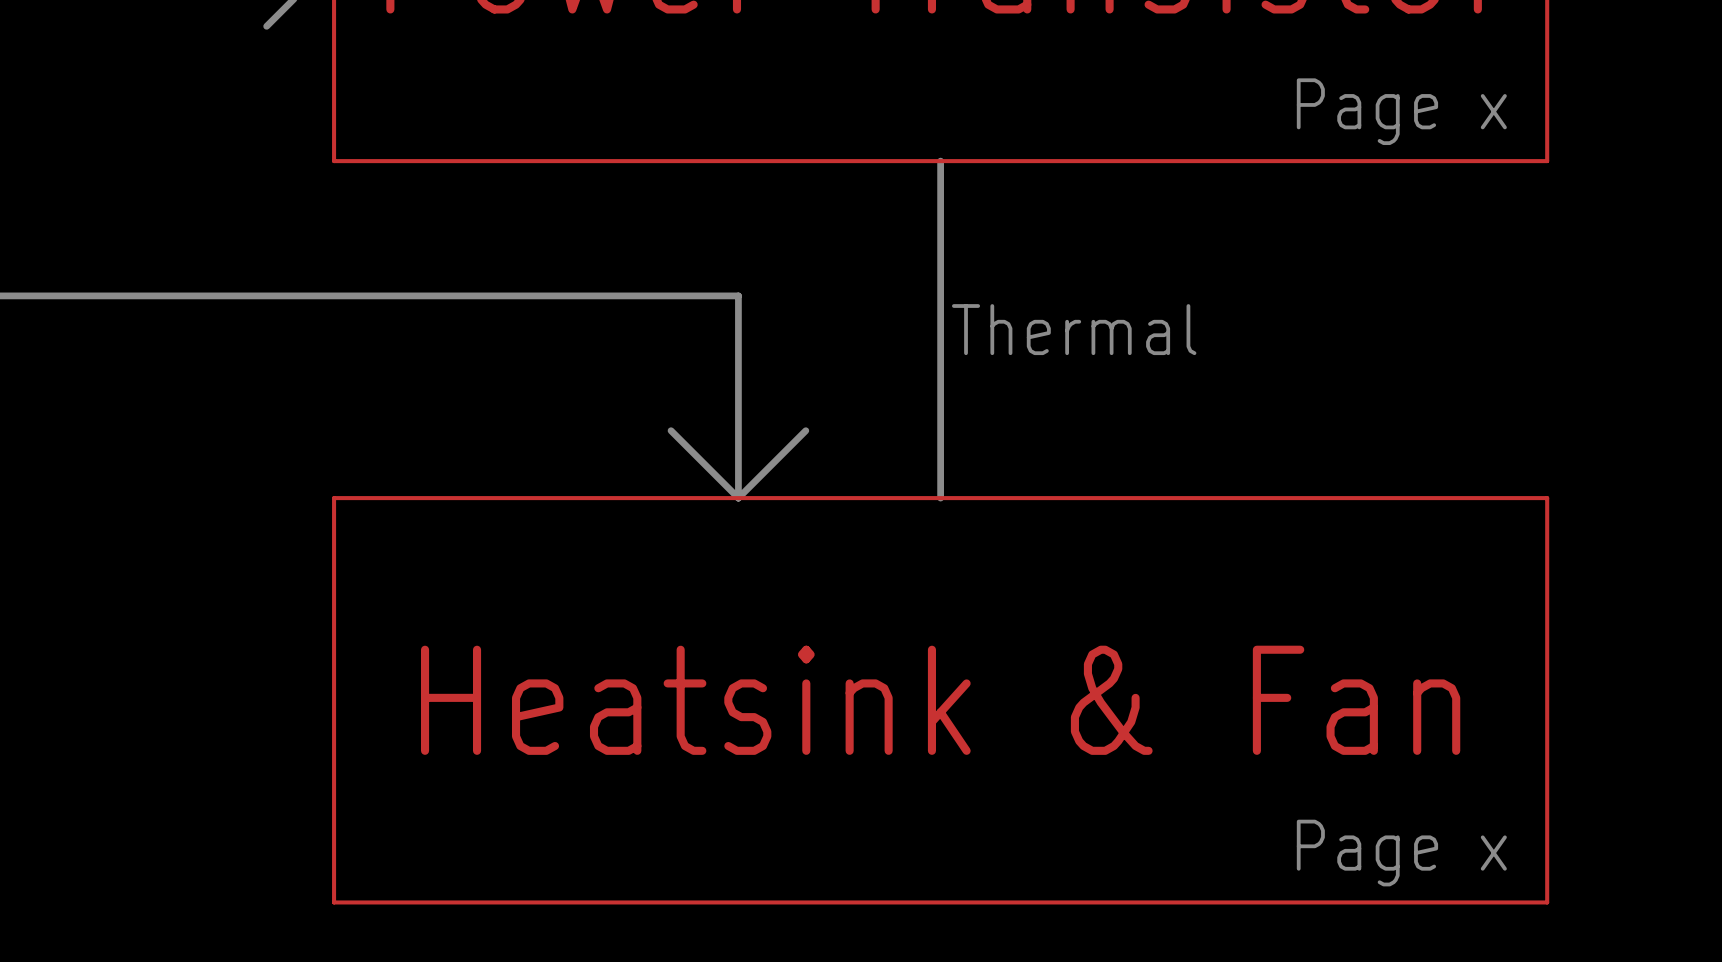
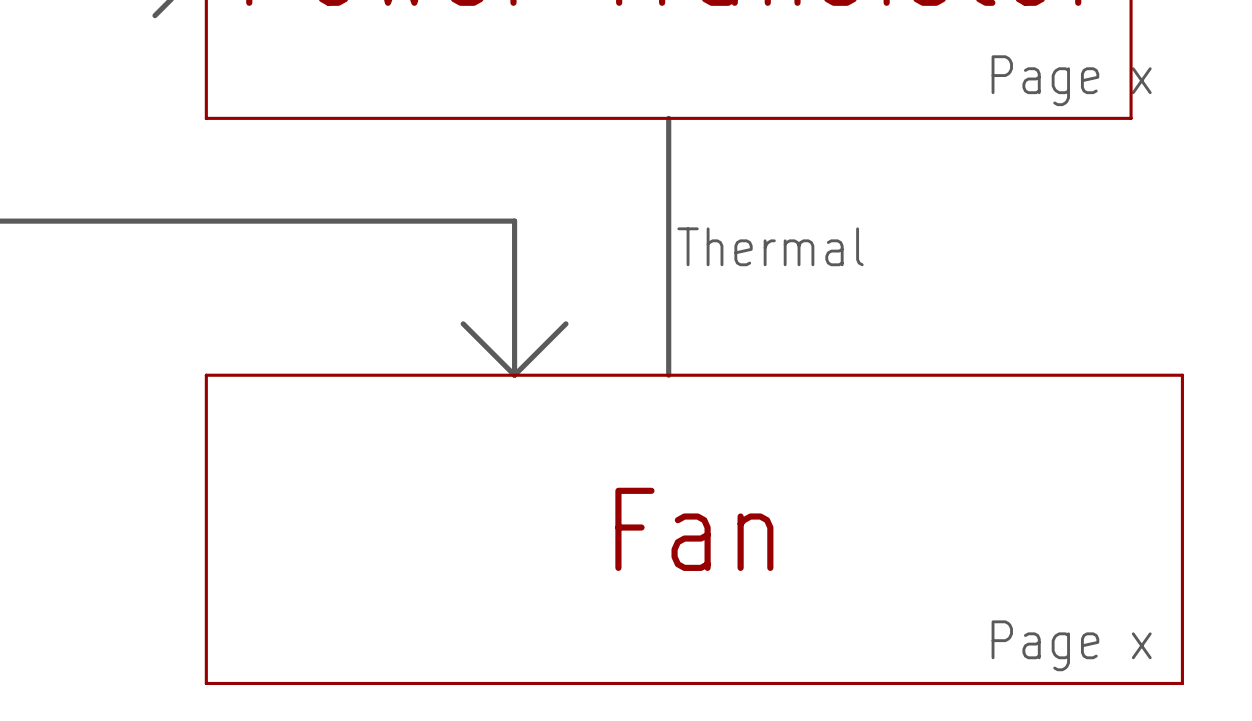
text position: Page x (1401, 111) -> Page x (1071, 80)
line: (1547, 498) (1547, 902) -> (1131, 375) (1182, 375) (1182, 683) (1131, 683)
text: Heatsink & Fan (940, 700) -> none
text: none -> Fan (694, 529)
text position: Page x (1401, 853) -> Page x (1071, 645)

